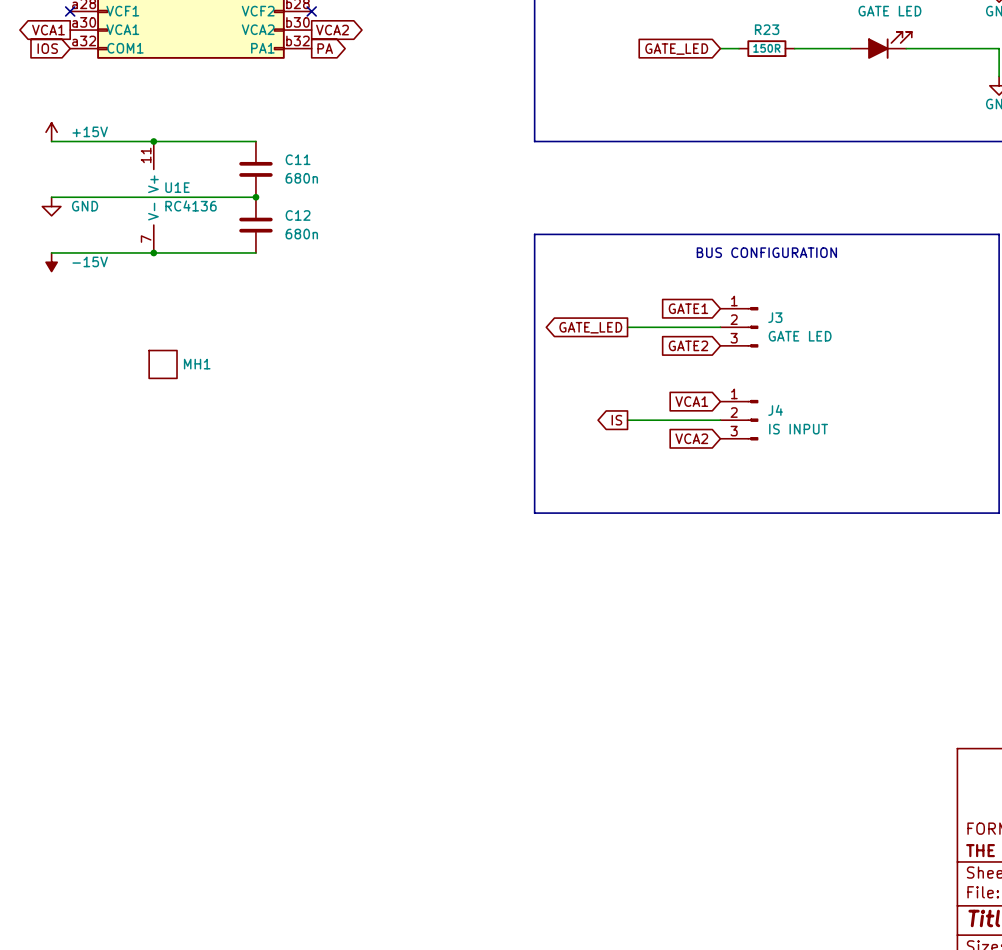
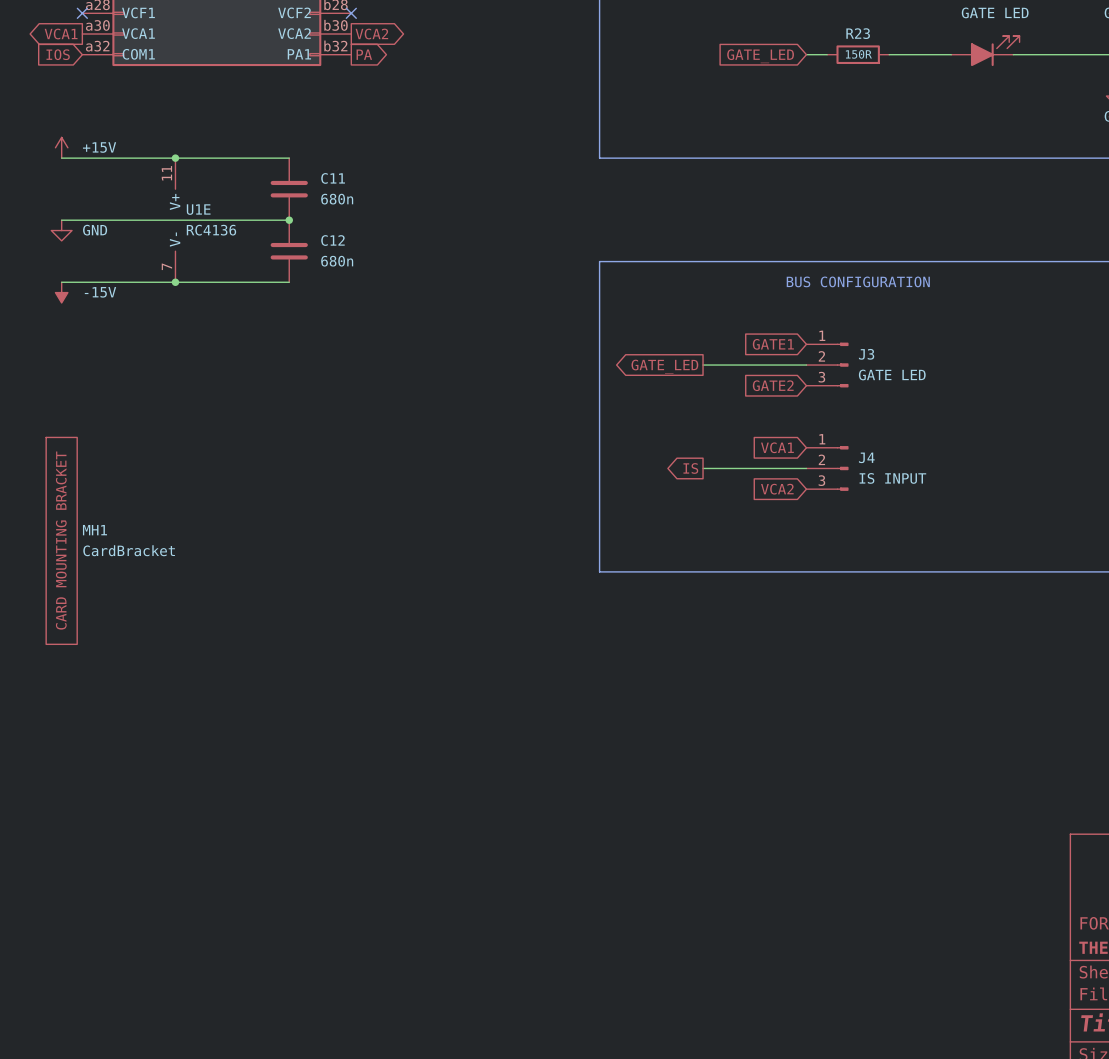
MH1 symbol: [149, 350, 178, 379] -> [46, 437, 78, 645]
MH1 value: none -> CardBracket (129, 550)

